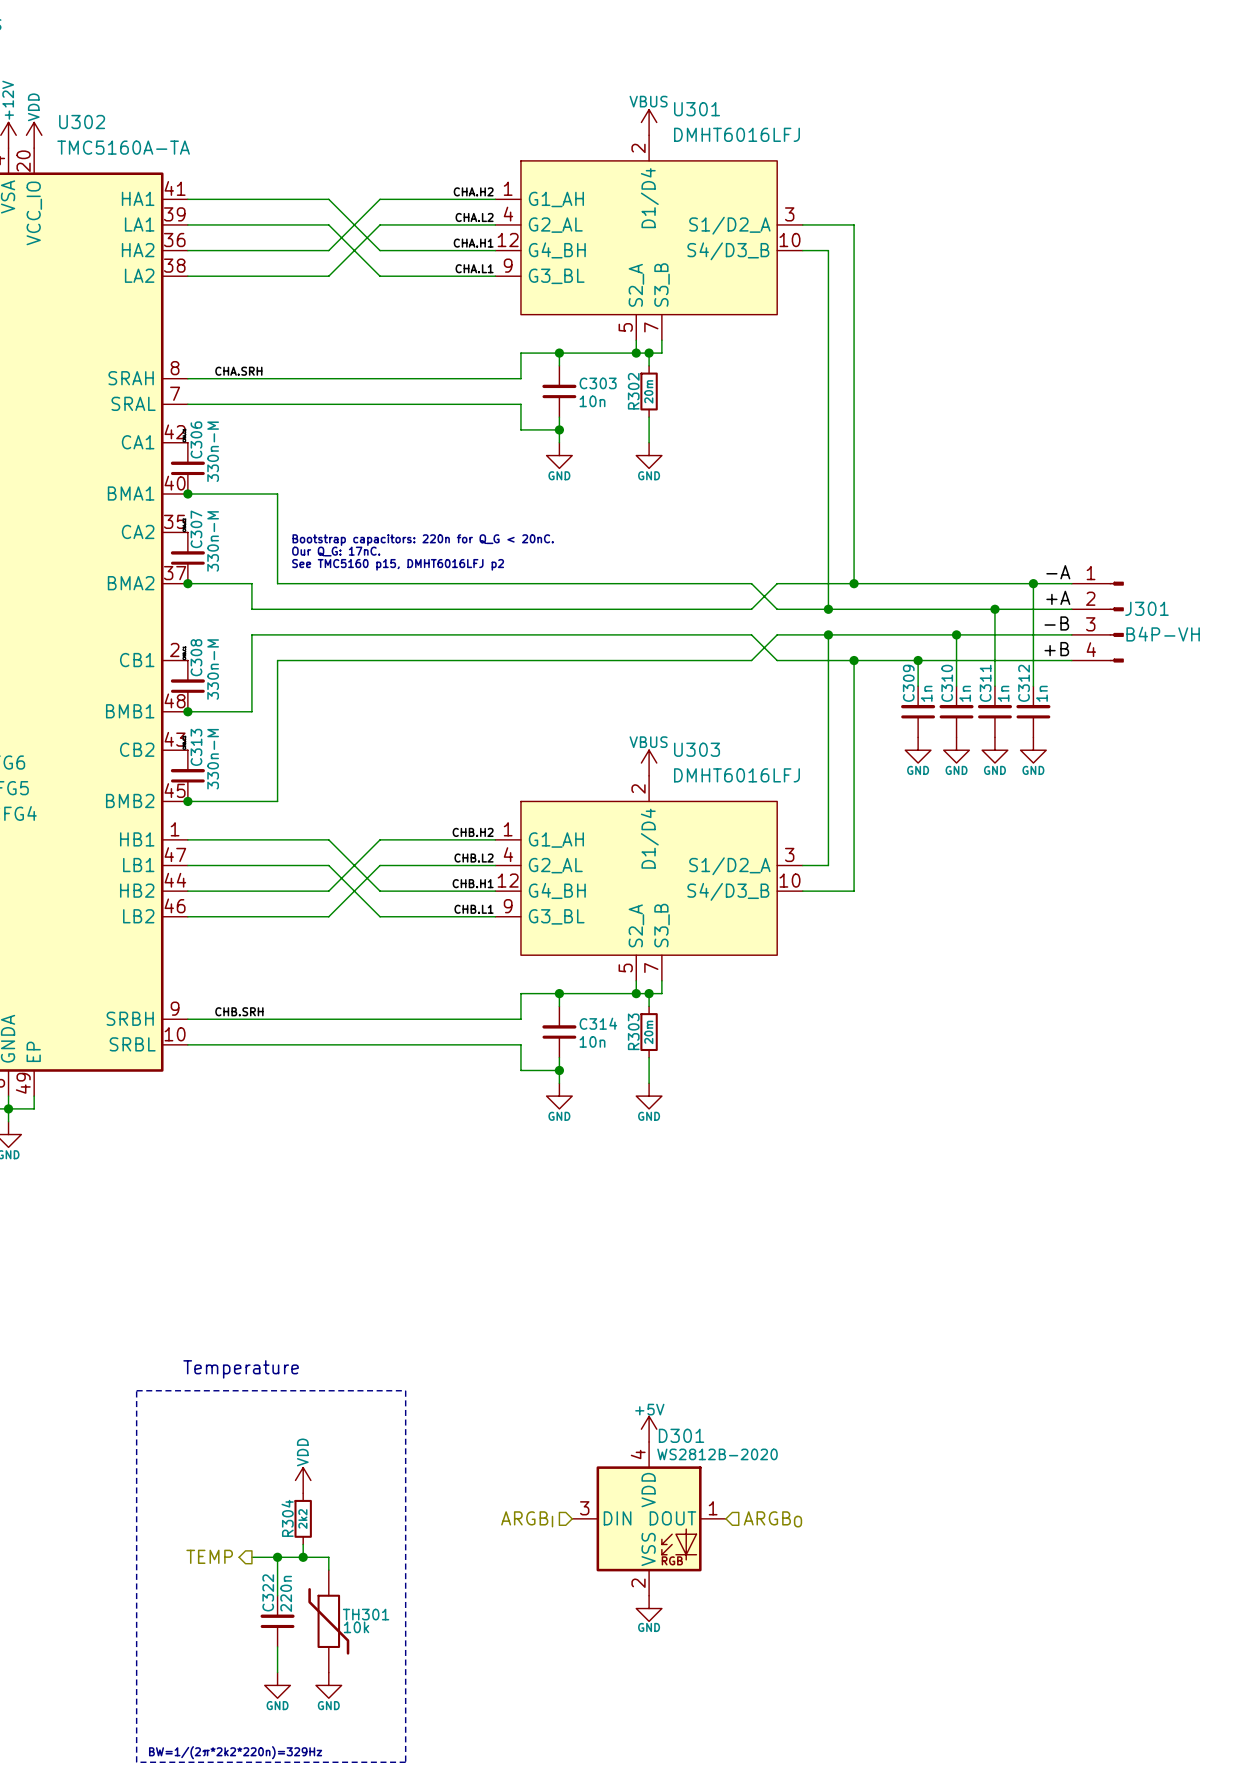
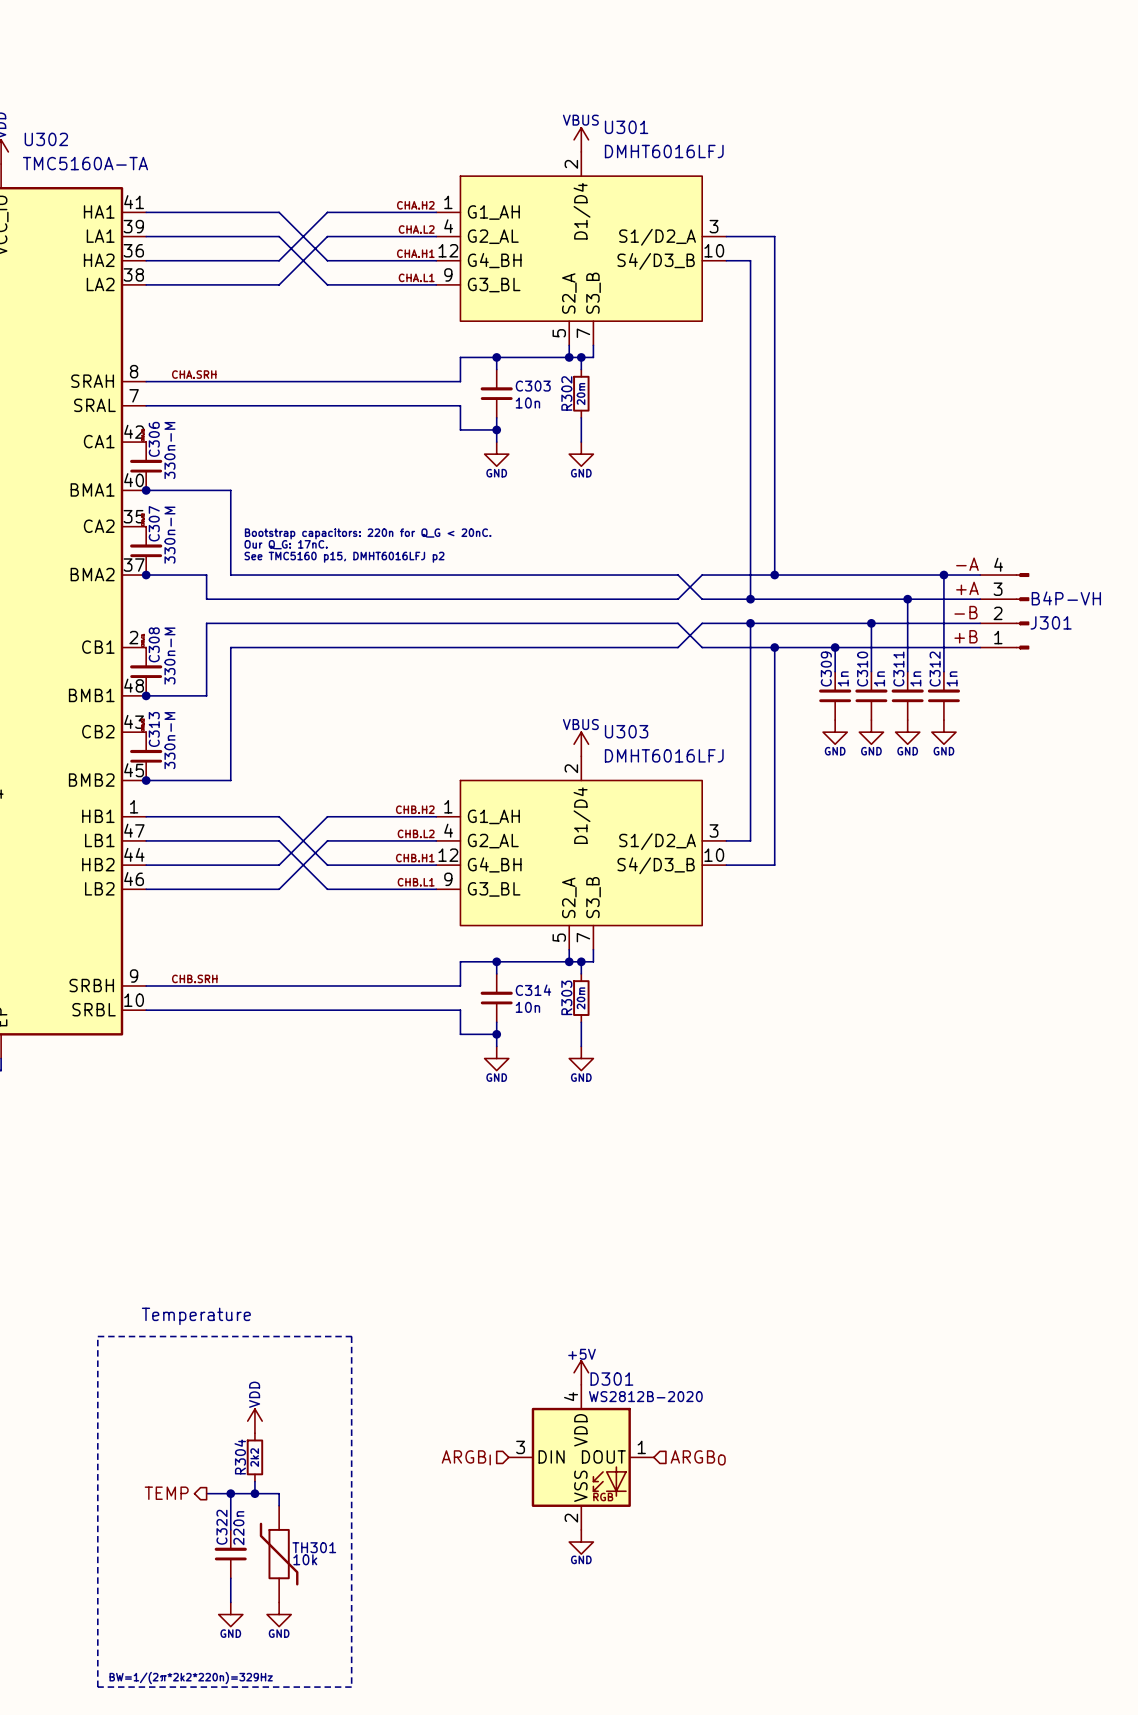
J301 flip: as is (1116, 622) -> up-down (1022, 611)

